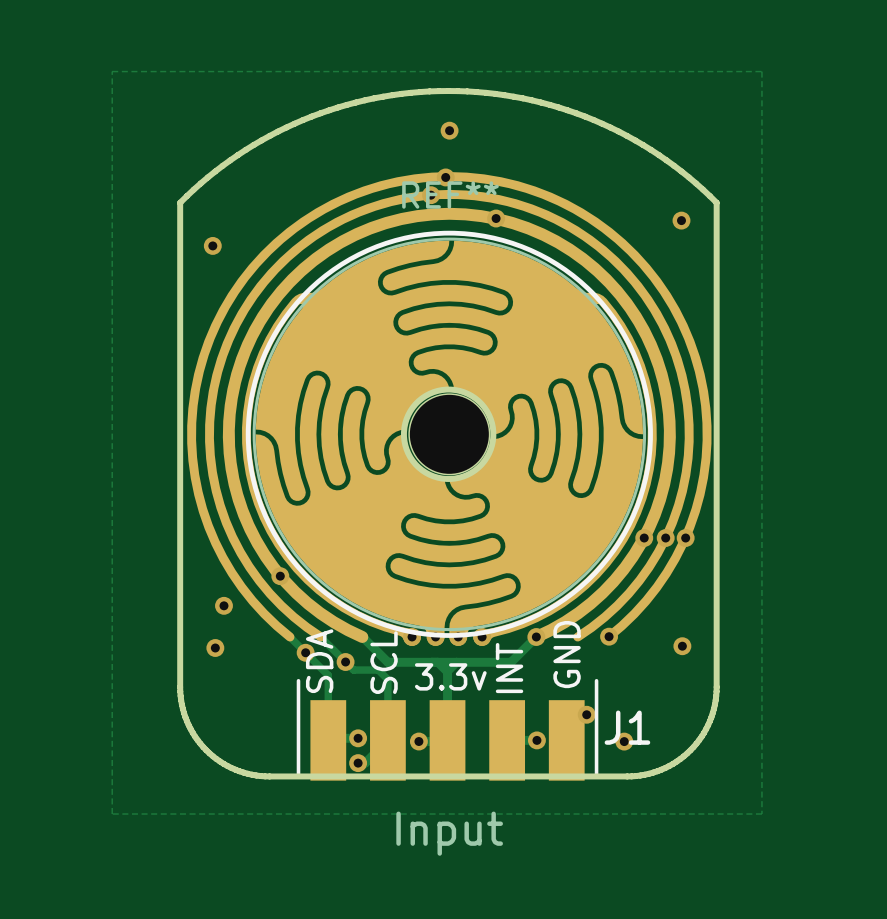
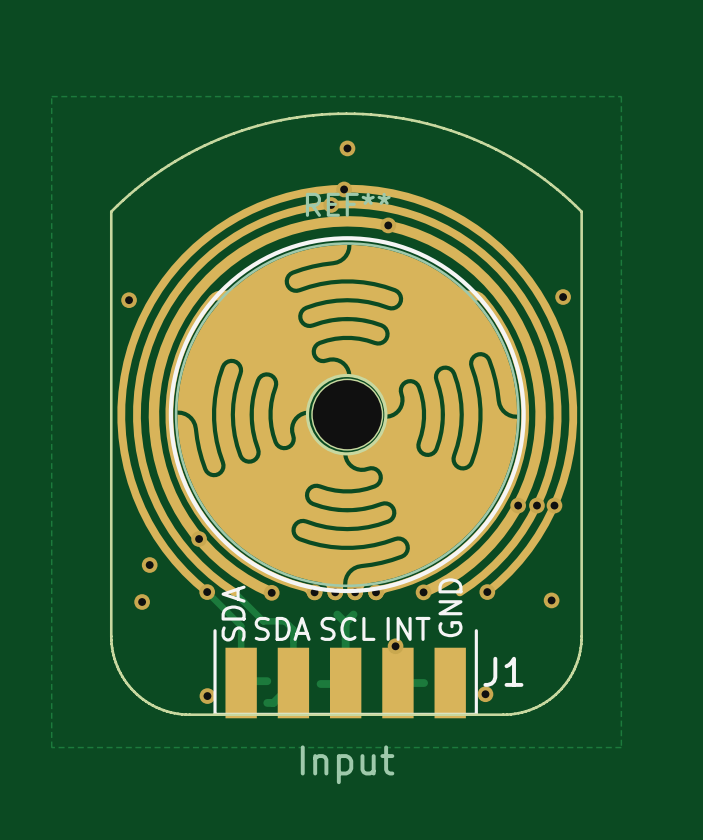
drawing: none -> [109, 112, 583, 716]
board edge: (448, 91) (485, 92) (522, 98) (558, 107) (593, 120) (627, 135) (658, 155) (688, 177) (716, 202) (716, 695) (709, 721) (696, 743) (676, 761) (653, 772) (627, 776) (256, 775) (231, 767) (212, 756) (195, 736) (184, 713) (180, 687) (180, 202) (207, 177) (237, 155) (269, 135) (303, 120) (337, 107) (373, 98) (410, 92) (448, 91) -> none
via position: (681, 220) -> (563, 297)
via position: (212, 245) -> (129, 300)
round board edge: [400, 386, 497, 482] -> none
via: none -> (271, 592)
track: (536, 637) (511, 662) (387, 662) (363, 637) -> none
via position: (305, 652) -> (207, 592)
via: (345, 662) -> none
text: SCL (384, 662) -> SDA (282, 628)
text rotation: 0° (509, 668) -> 90° clockwise (408, 628)
text: 3.3v (450, 676) -> SCL (347, 628)
via: none -> (395, 646)
via: (586, 714) -> none
via: (358, 738) -> none
via: (536, 740) -> none
via: (418, 741) -> none
via position: (624, 741) -> (485, 694)
via: none -> (207, 696)
via: (358, 763) -> none

